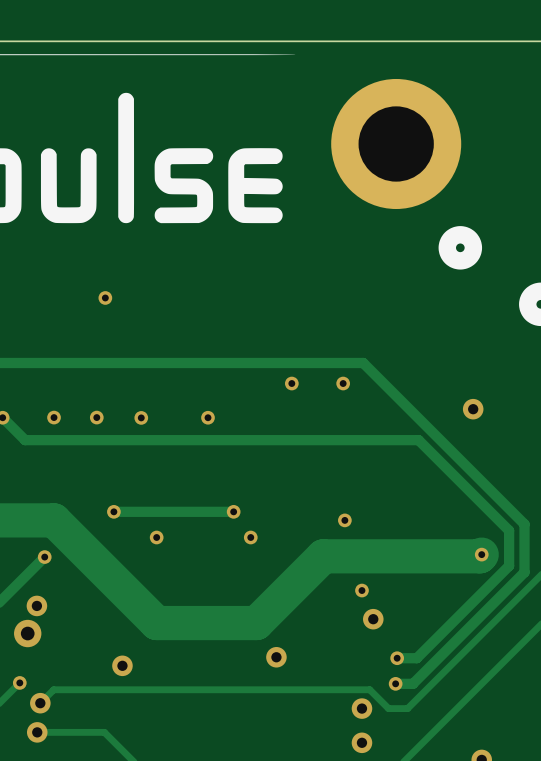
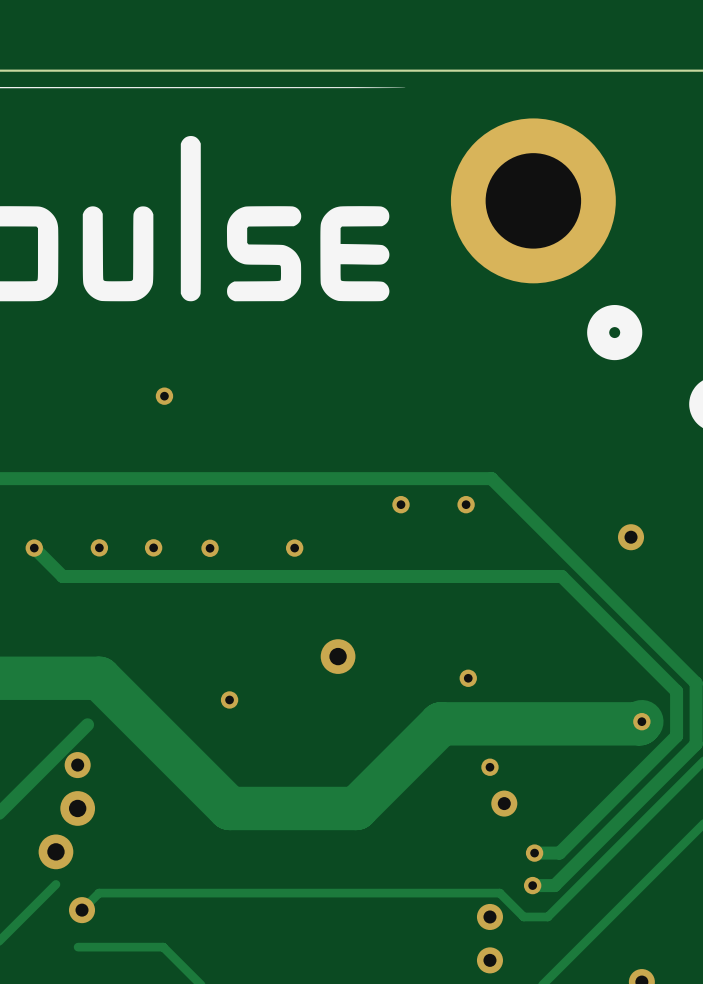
via size: [226, 504, 241, 519] -> [320, 639, 356, 674]
via: (113, 511) -> none
track: (233, 511) (113, 511) -> none
via: (250, 537) -> none
via: (44, 557) -> none
via position: (36, 605) -> (77, 765)
via: none -> (77, 808)
via: (27, 633) -> none
via: none -> (55, 851)
via: (276, 657) -> none
via: (122, 665) -> none
via: (19, 682) -> none
via: (37, 732) -> none

